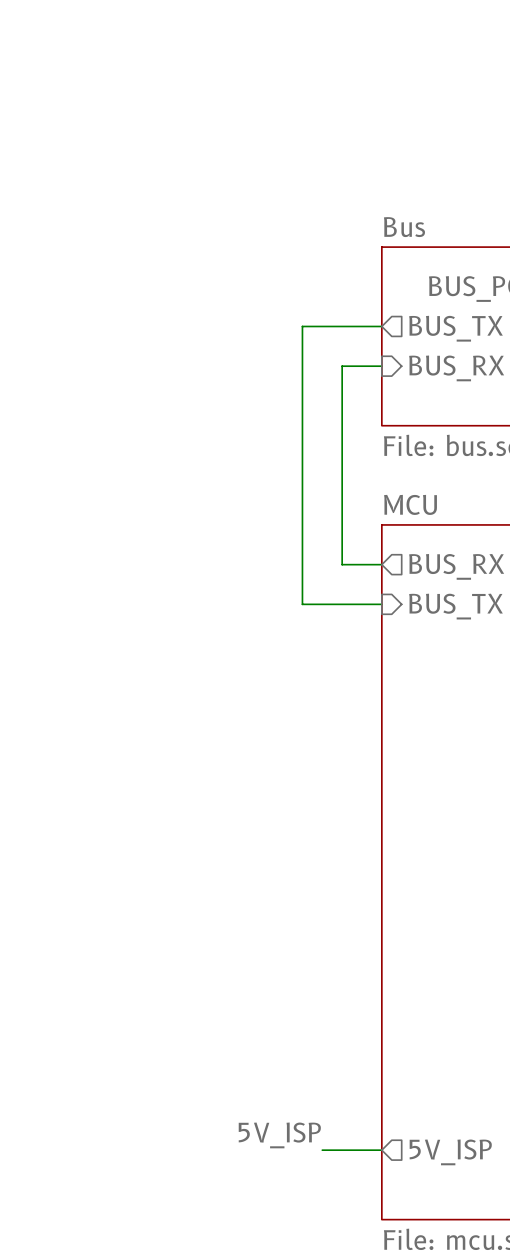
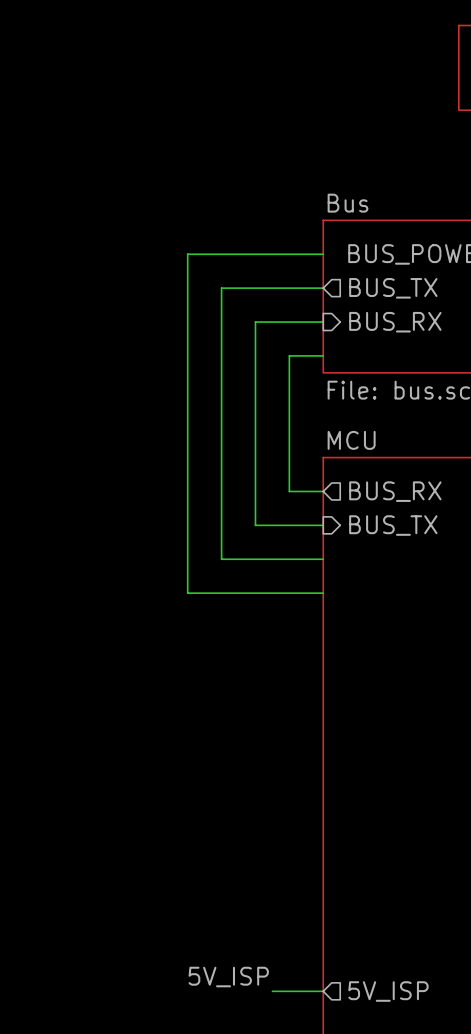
wire: none -> (323, 254) (187, 254) (187, 593) (323, 593)
wire: (302, 326) (302, 366) -> (289, 322) (255, 322)
wire: none -> (255, 288) (221, 288) (221, 559) (323, 559)
wire: (342, 366) (342, 405) -> (323, 355) (289, 355)

